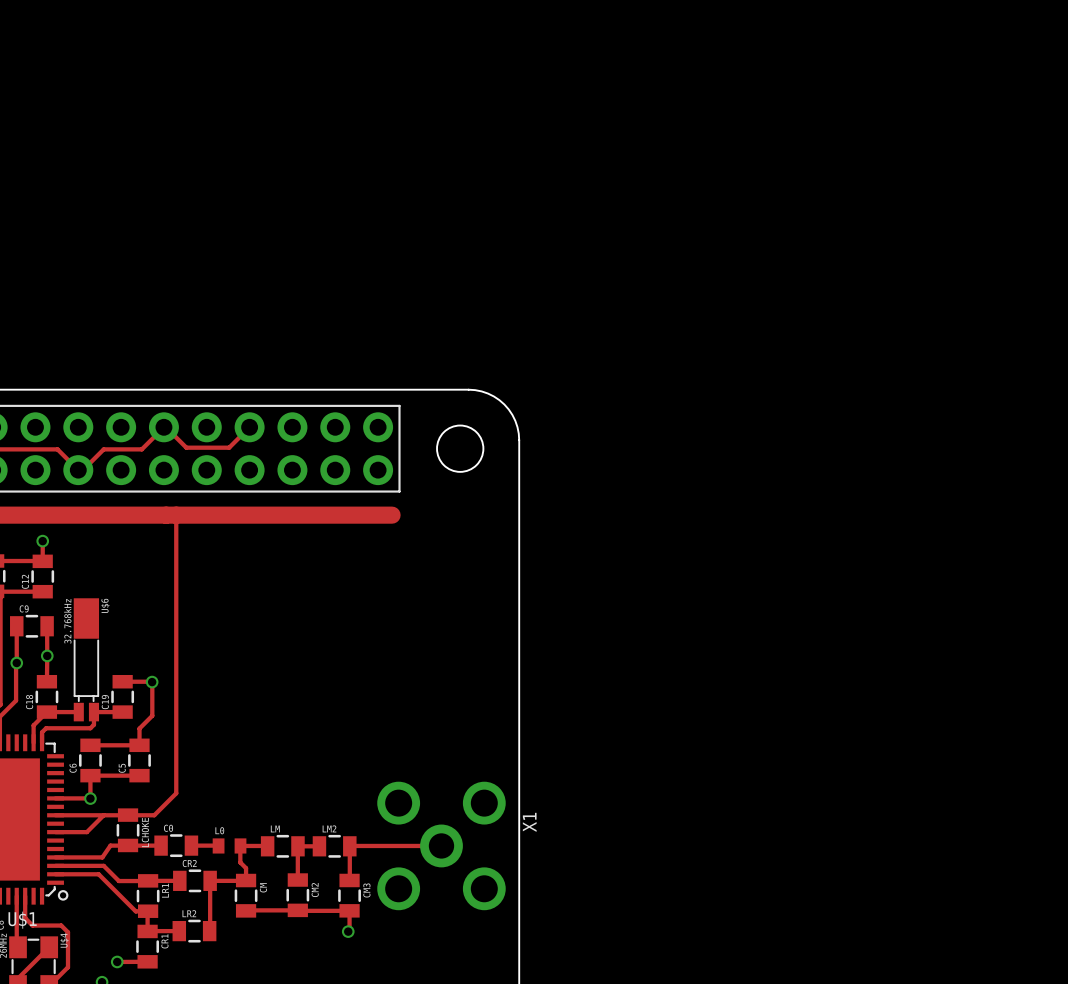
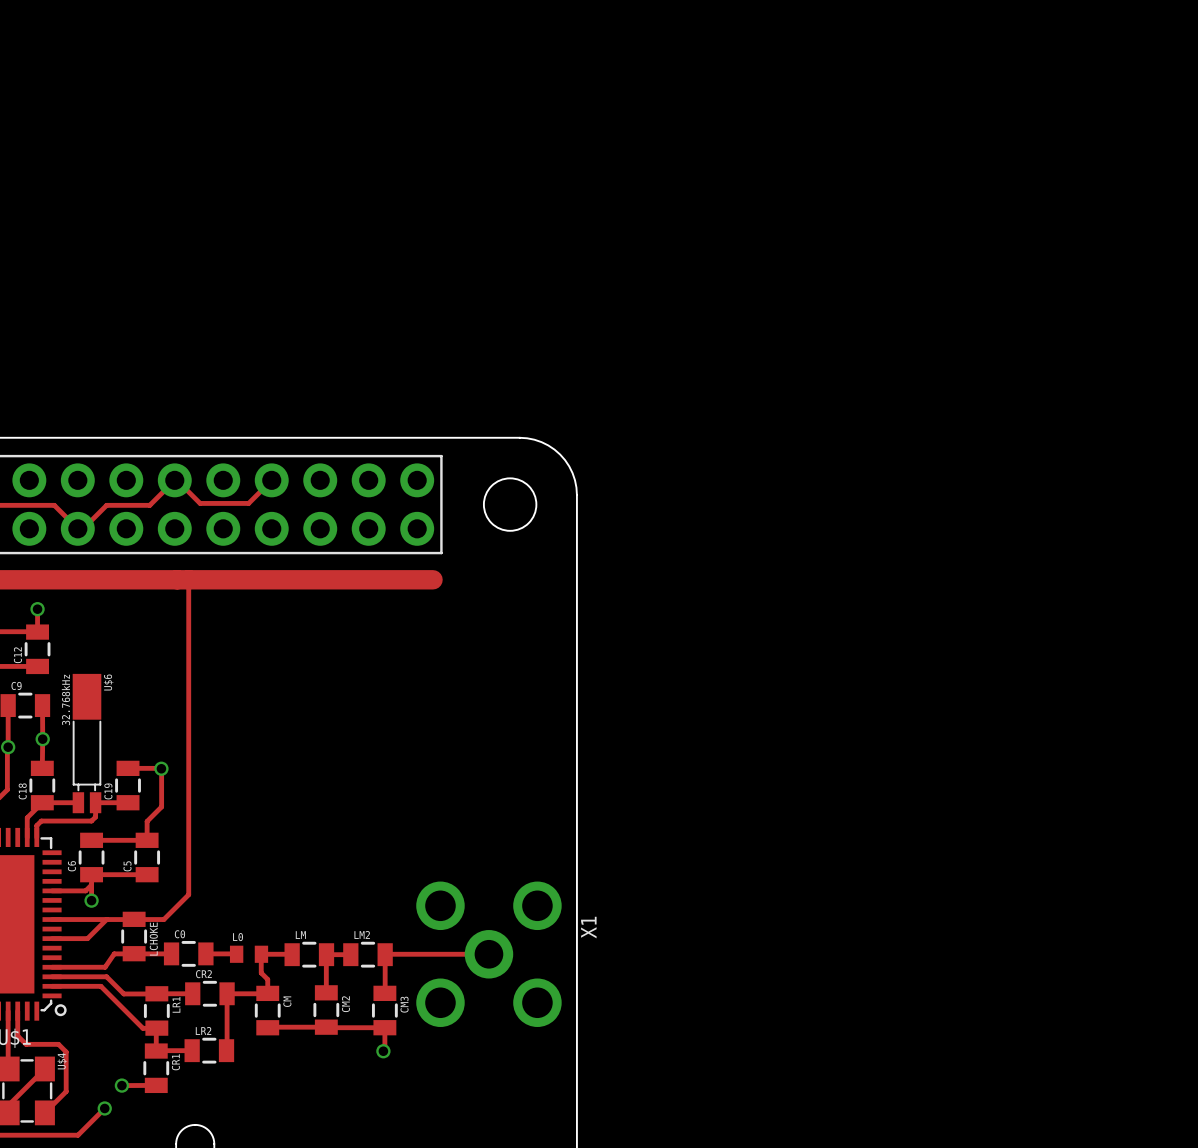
track: none -> (91, 885) (85, 890) (52, 890)
track: (55, 798) (90, 798) -> none

